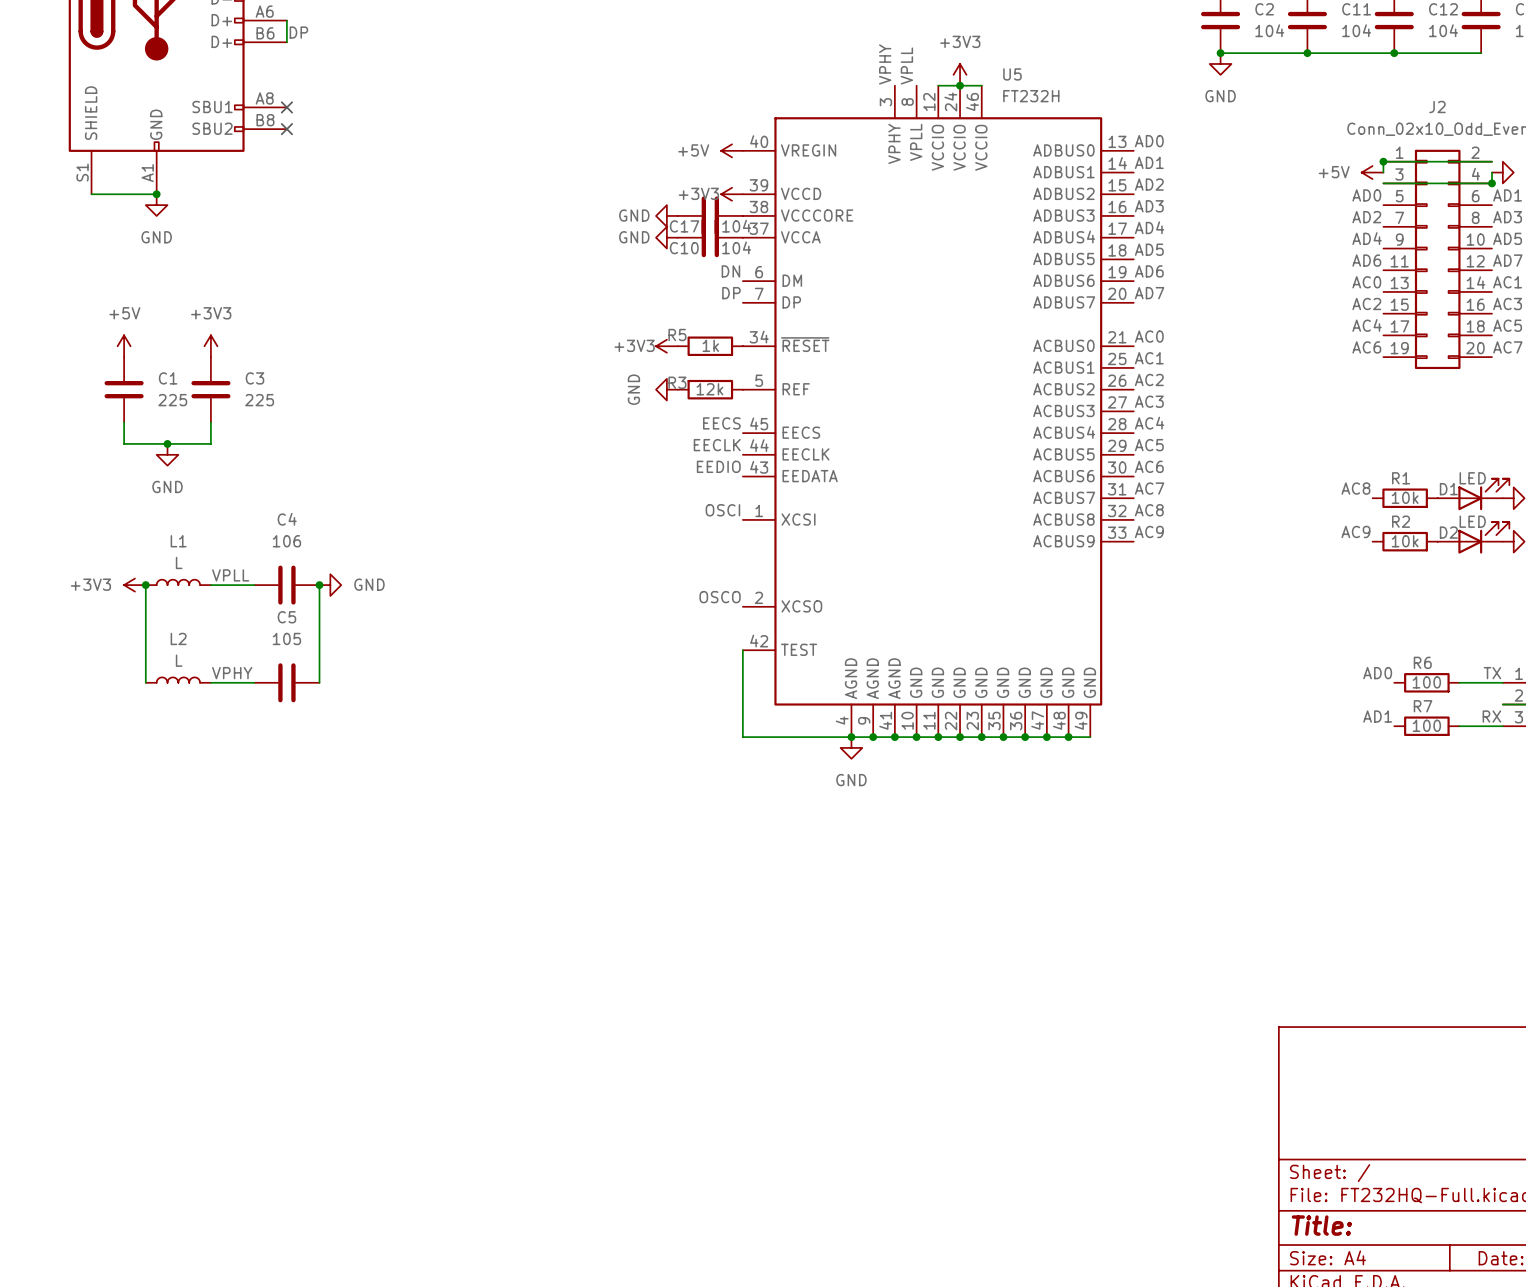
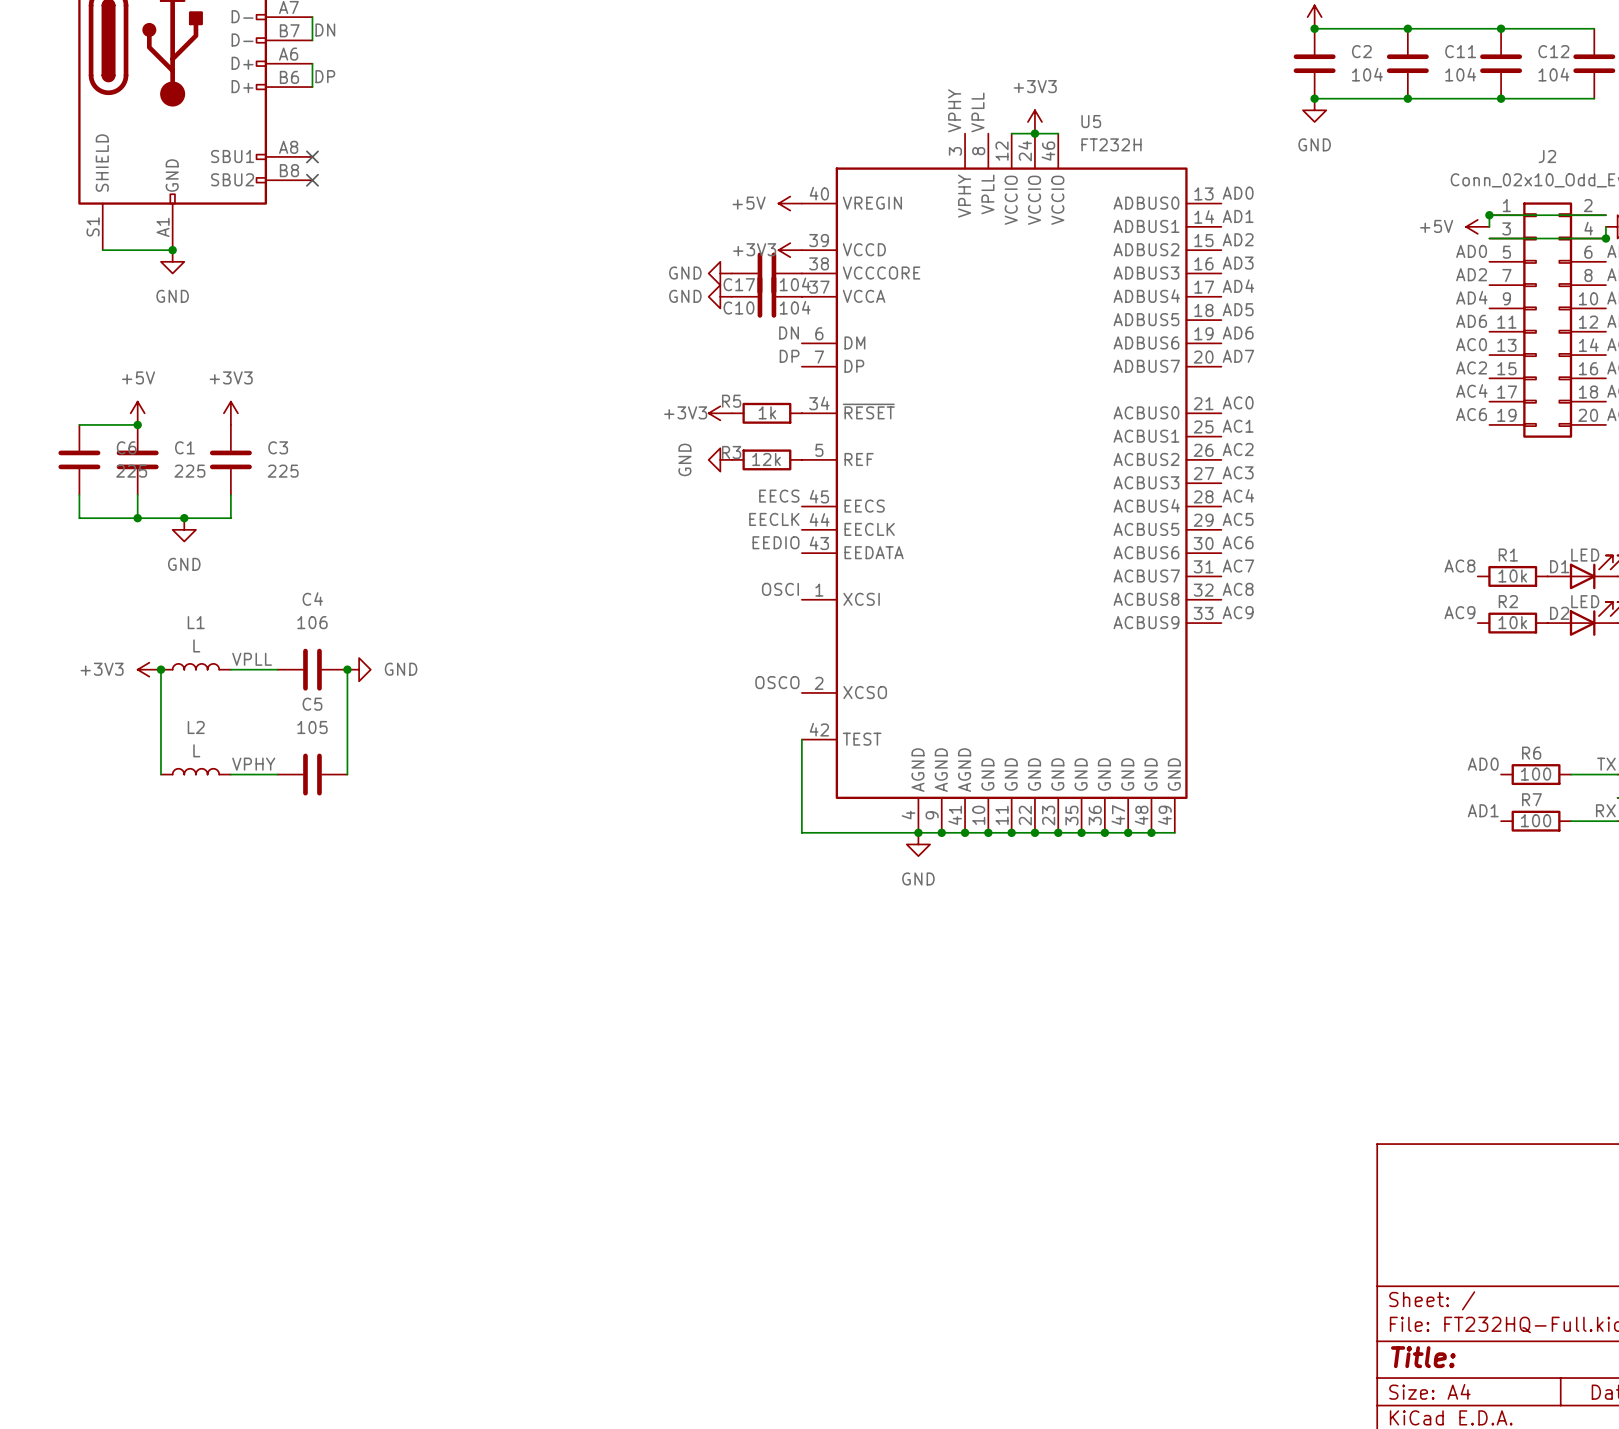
wire: none -> (79, 424) (137, 424)
junction: none -> (137, 424)
C6: none -> 225 (79, 459)
wire: none -> (79, 494) (79, 518) (137, 518)
junction: none -> (137, 518)

